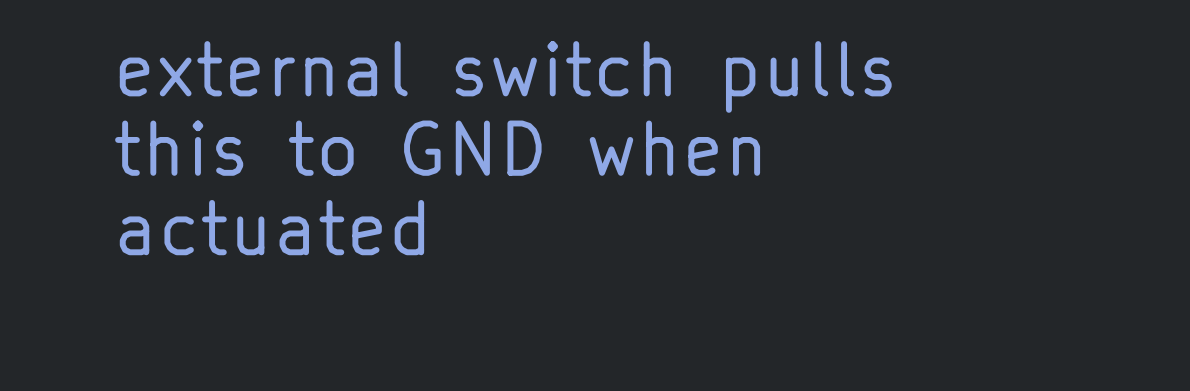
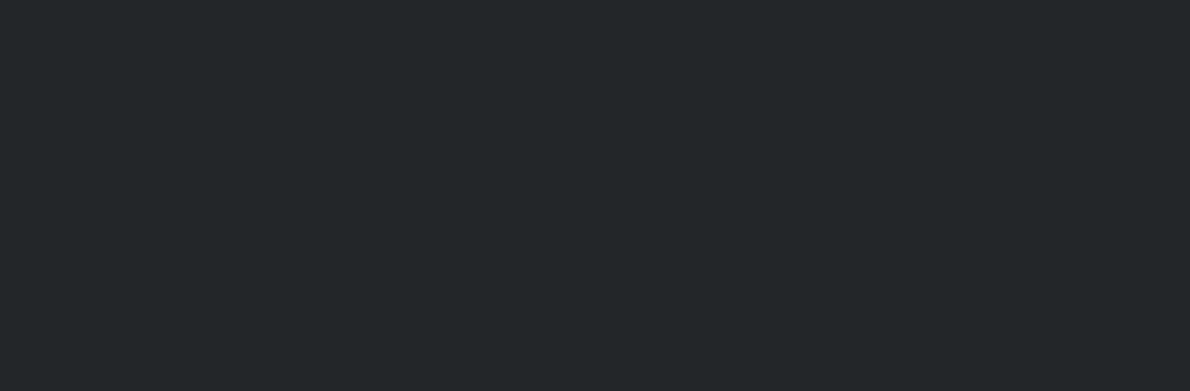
text: external switch pulls (505, 76) -> none
text: this to GND when (437, 148) -> none
text: actuated (271, 227) -> none

